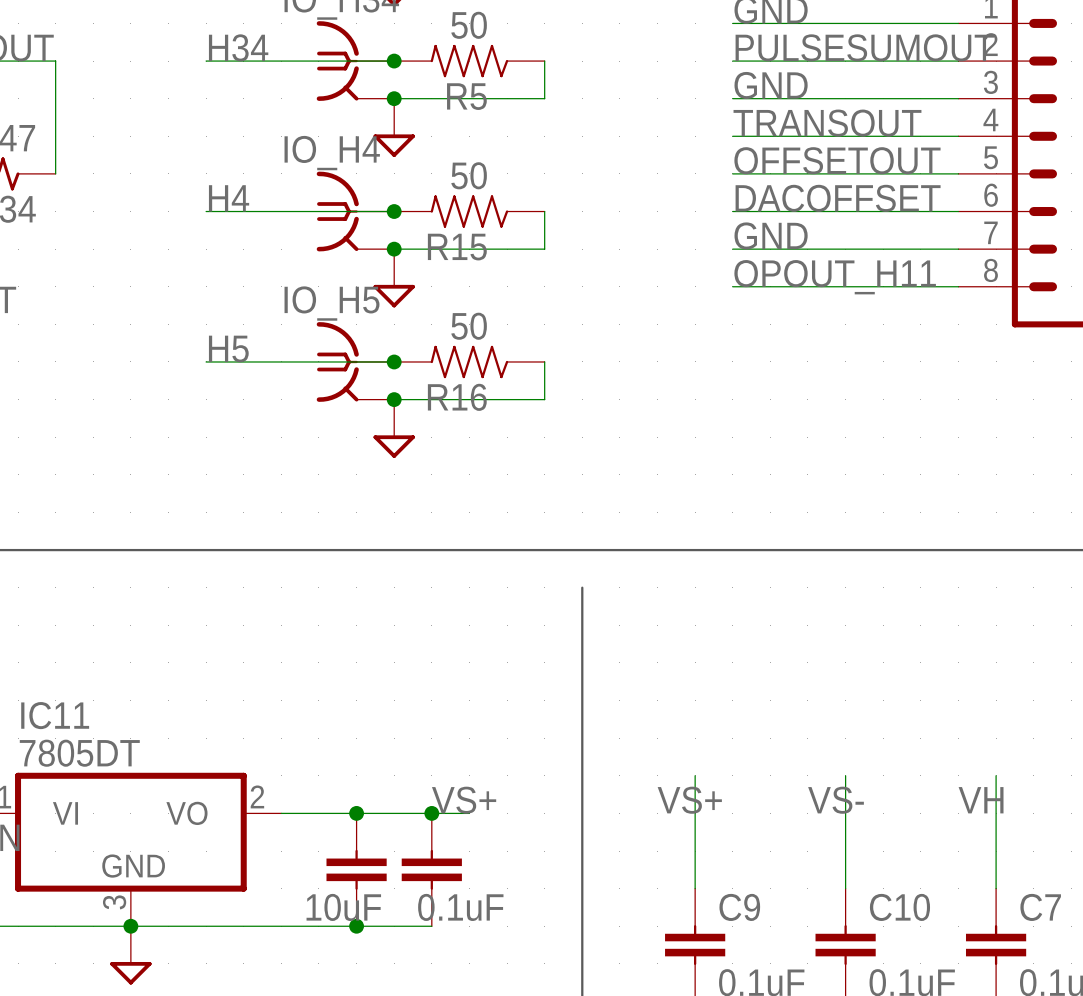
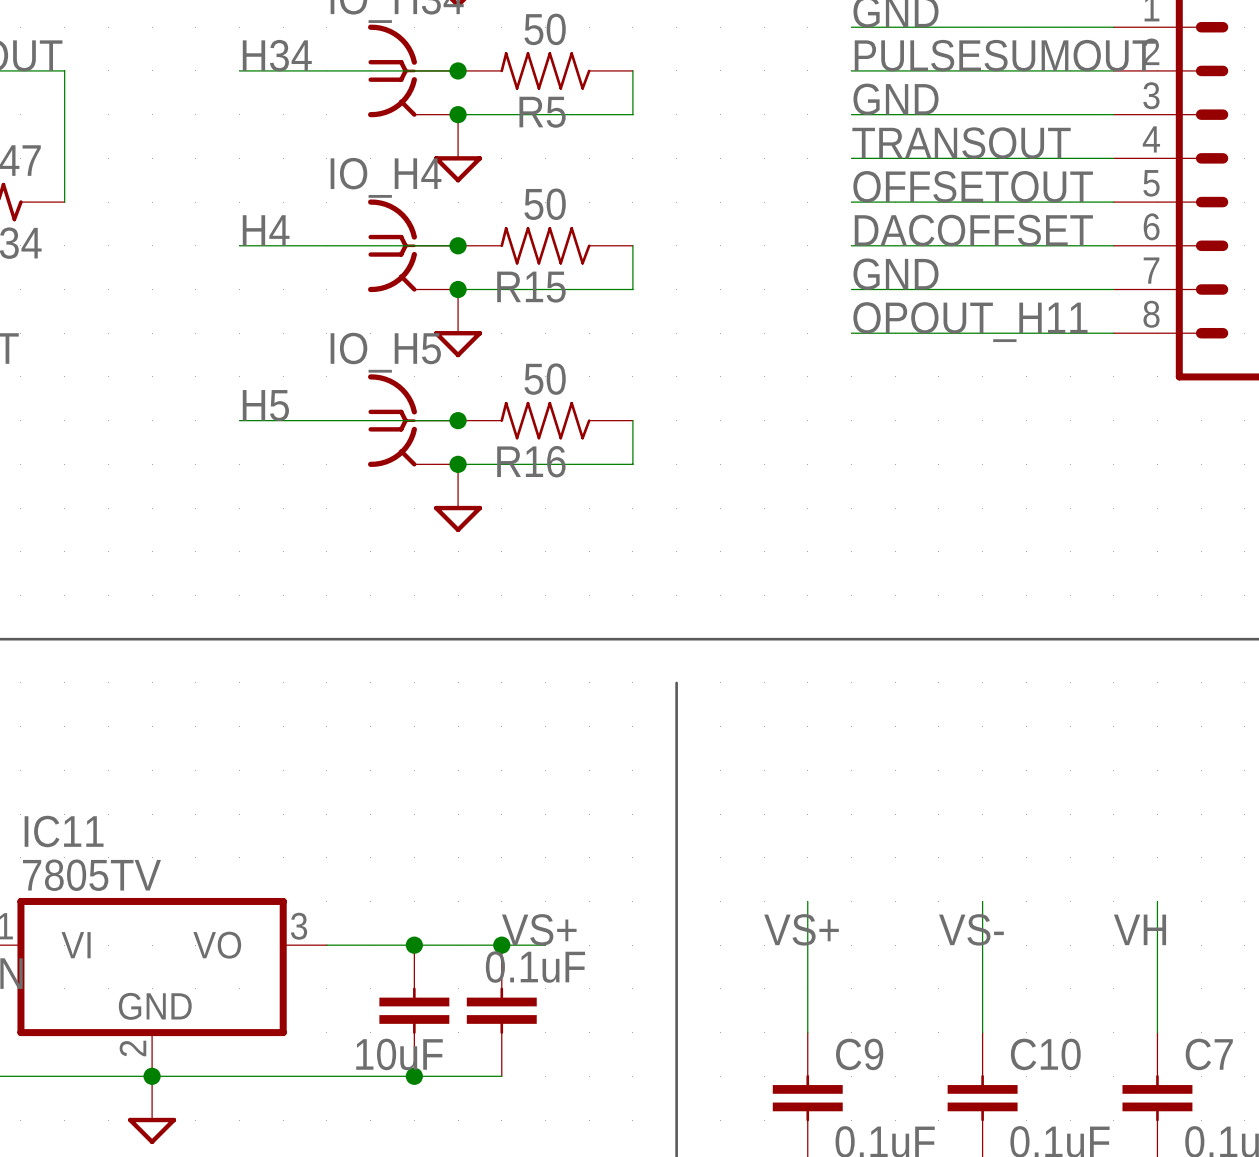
IC11 value: 7805DT (79, 753) -> 7805TV (91, 875)
IC11 pin number: 2 (257, 796) -> 3 (299, 926)
IC11 pin number: 3 (114, 902) -> 2 (132, 1048)
part value position: 0.1uF (460, 907) -> 0.1uF (535, 967)

